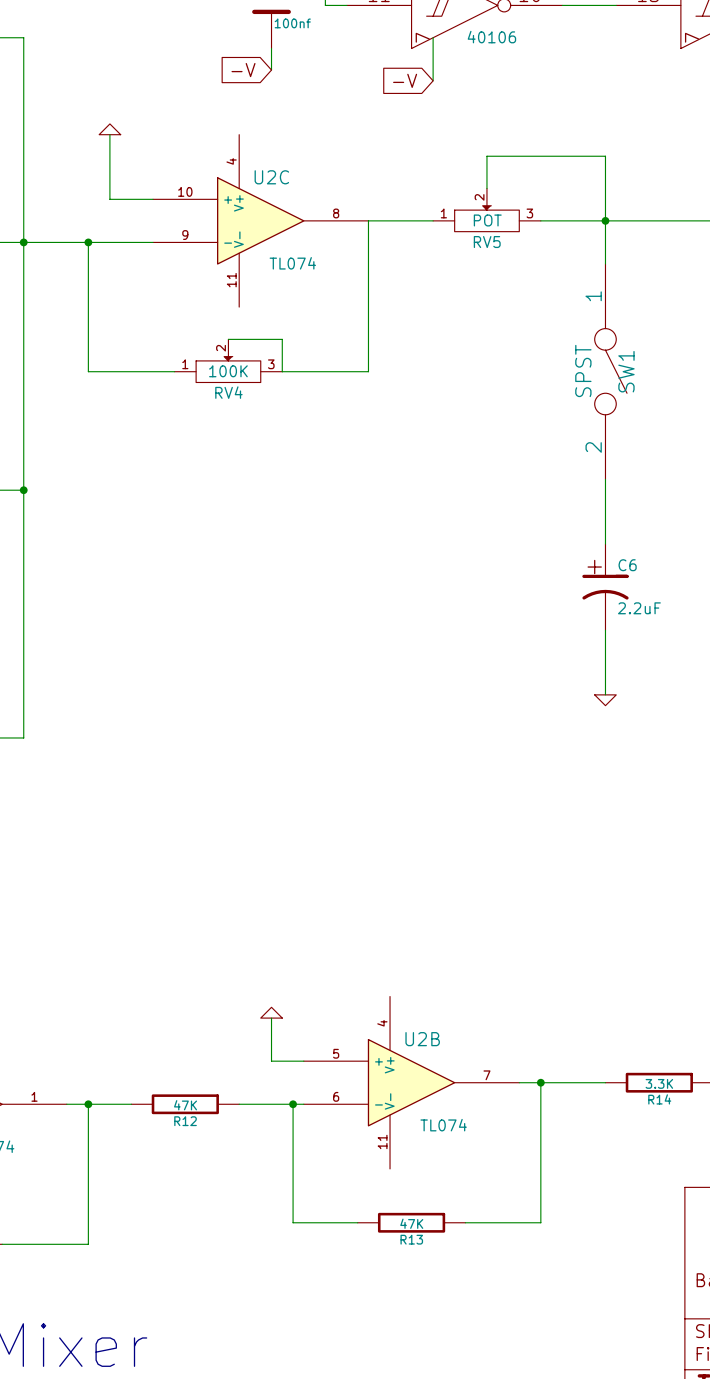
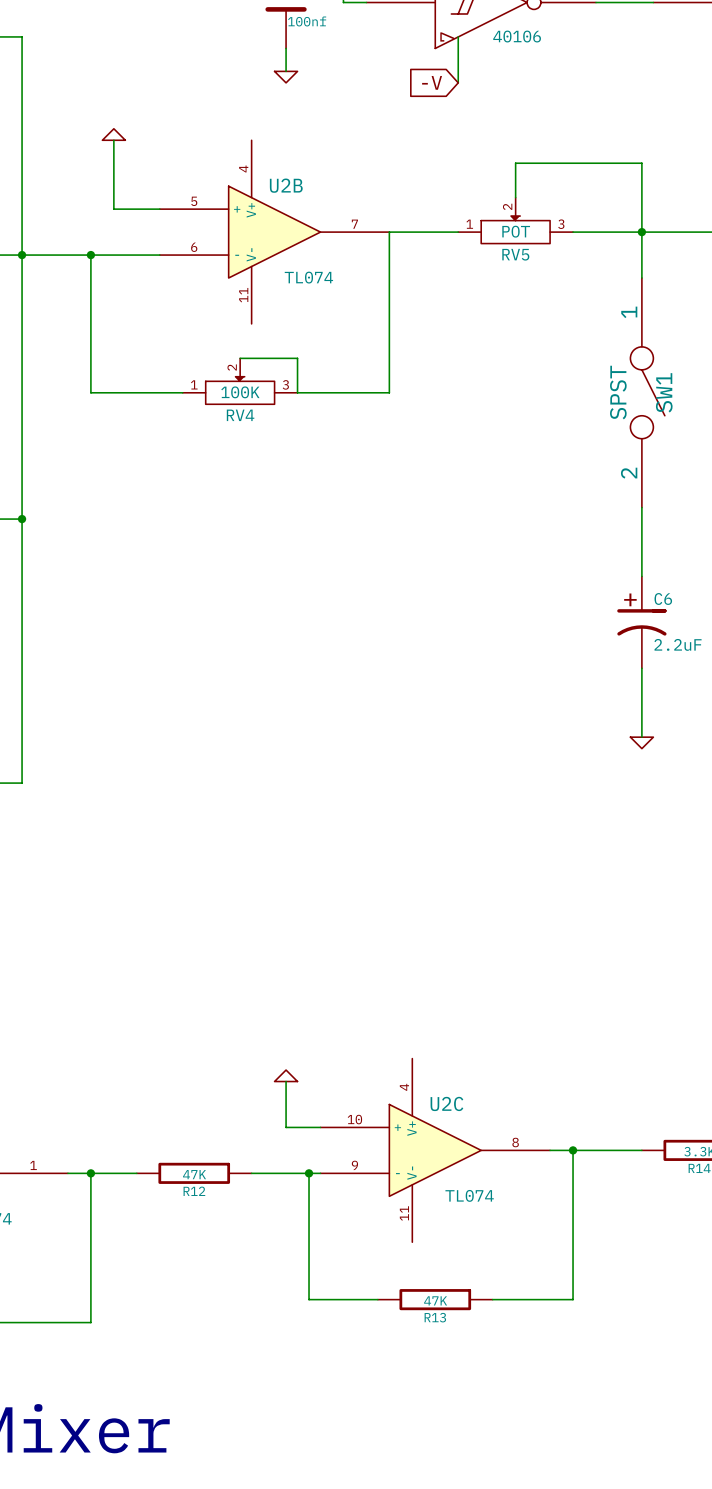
global label: -V (243, 70) -> none
power symbol: none -> (286, 77)
U2C position: (260, 220) -> (435, 1150)
U2B position: (411, 1082) -> (274, 232)

